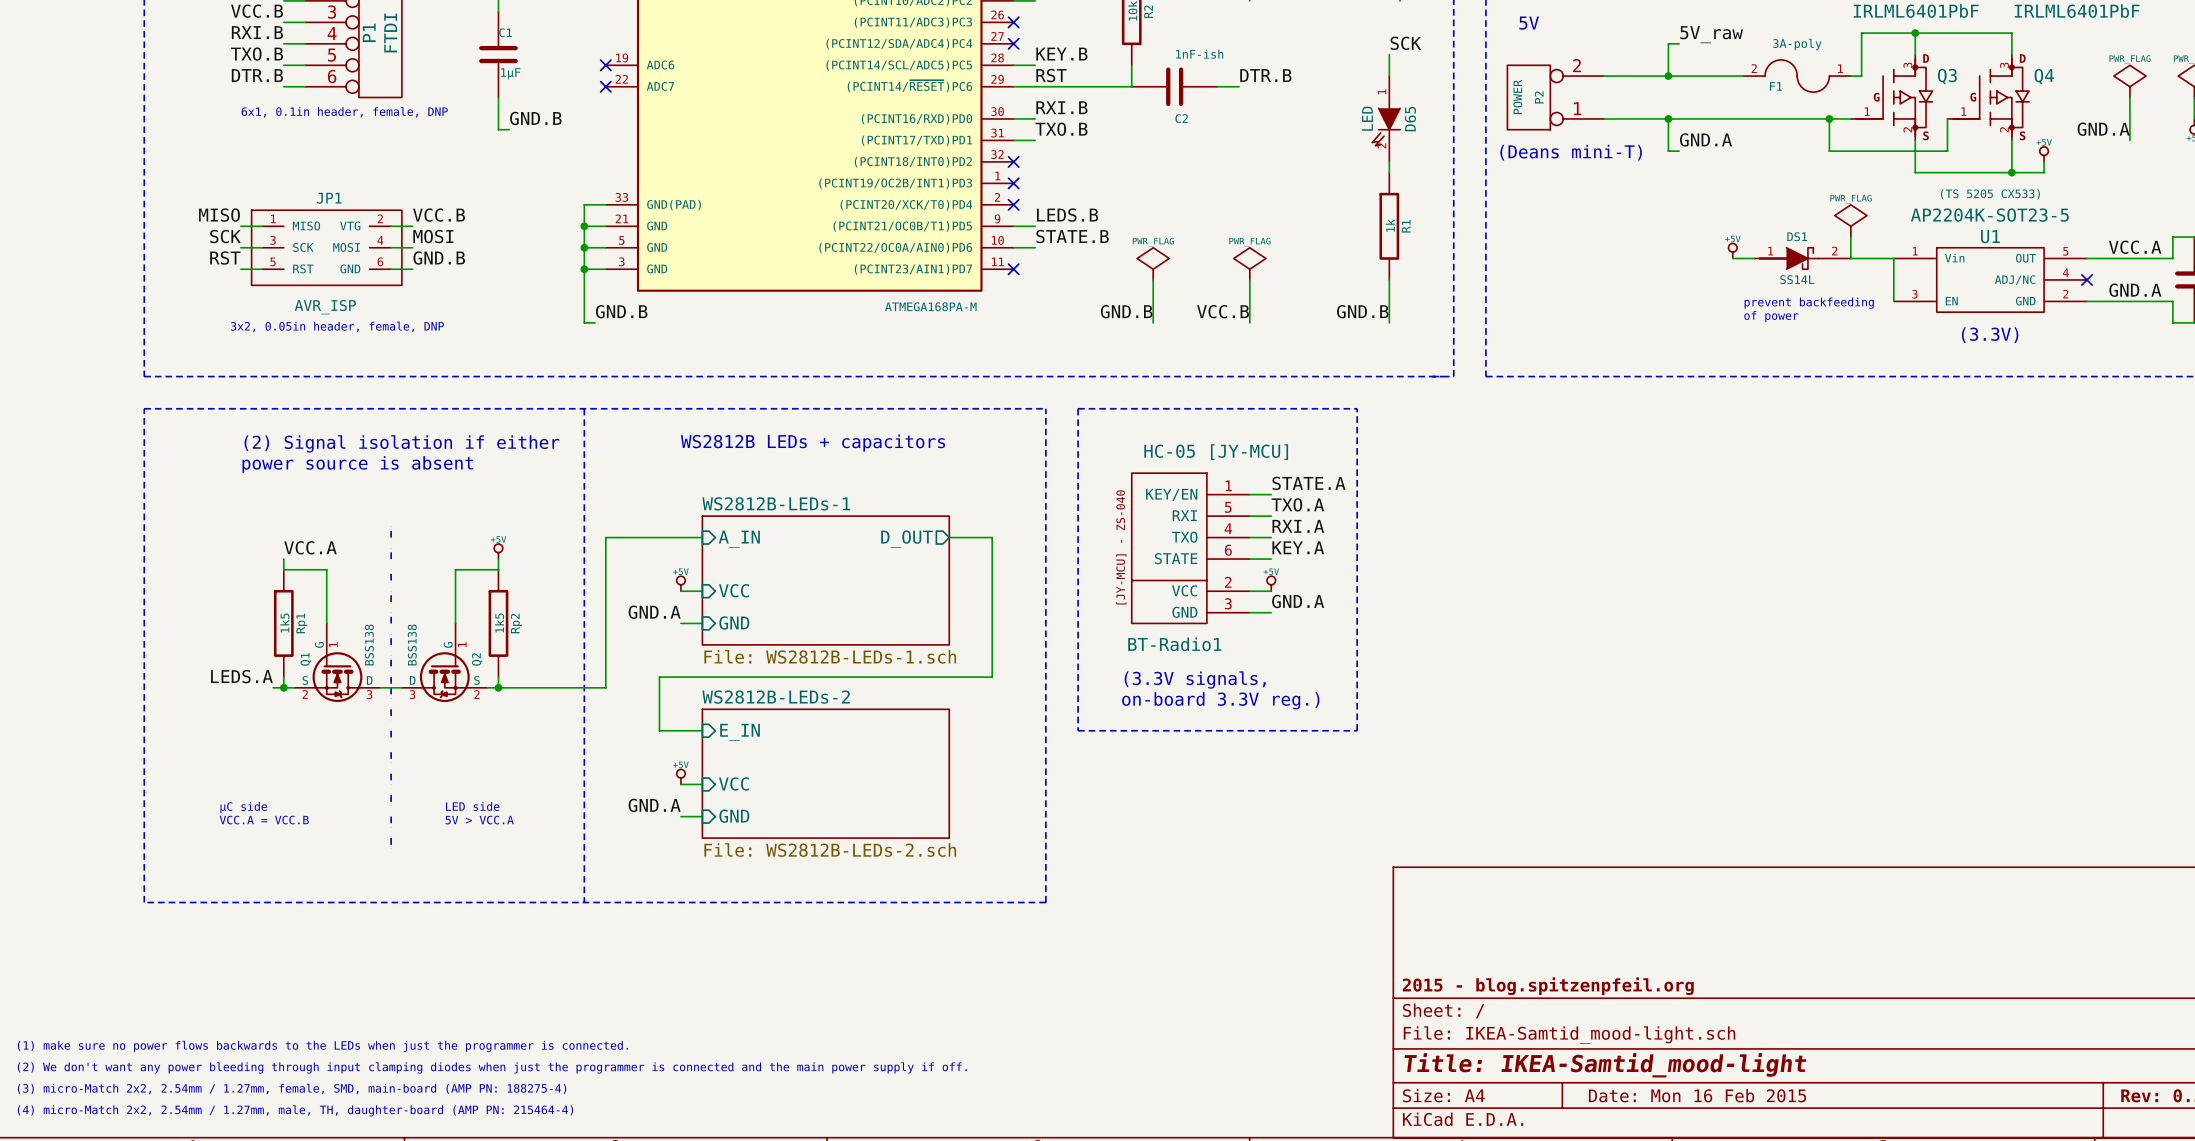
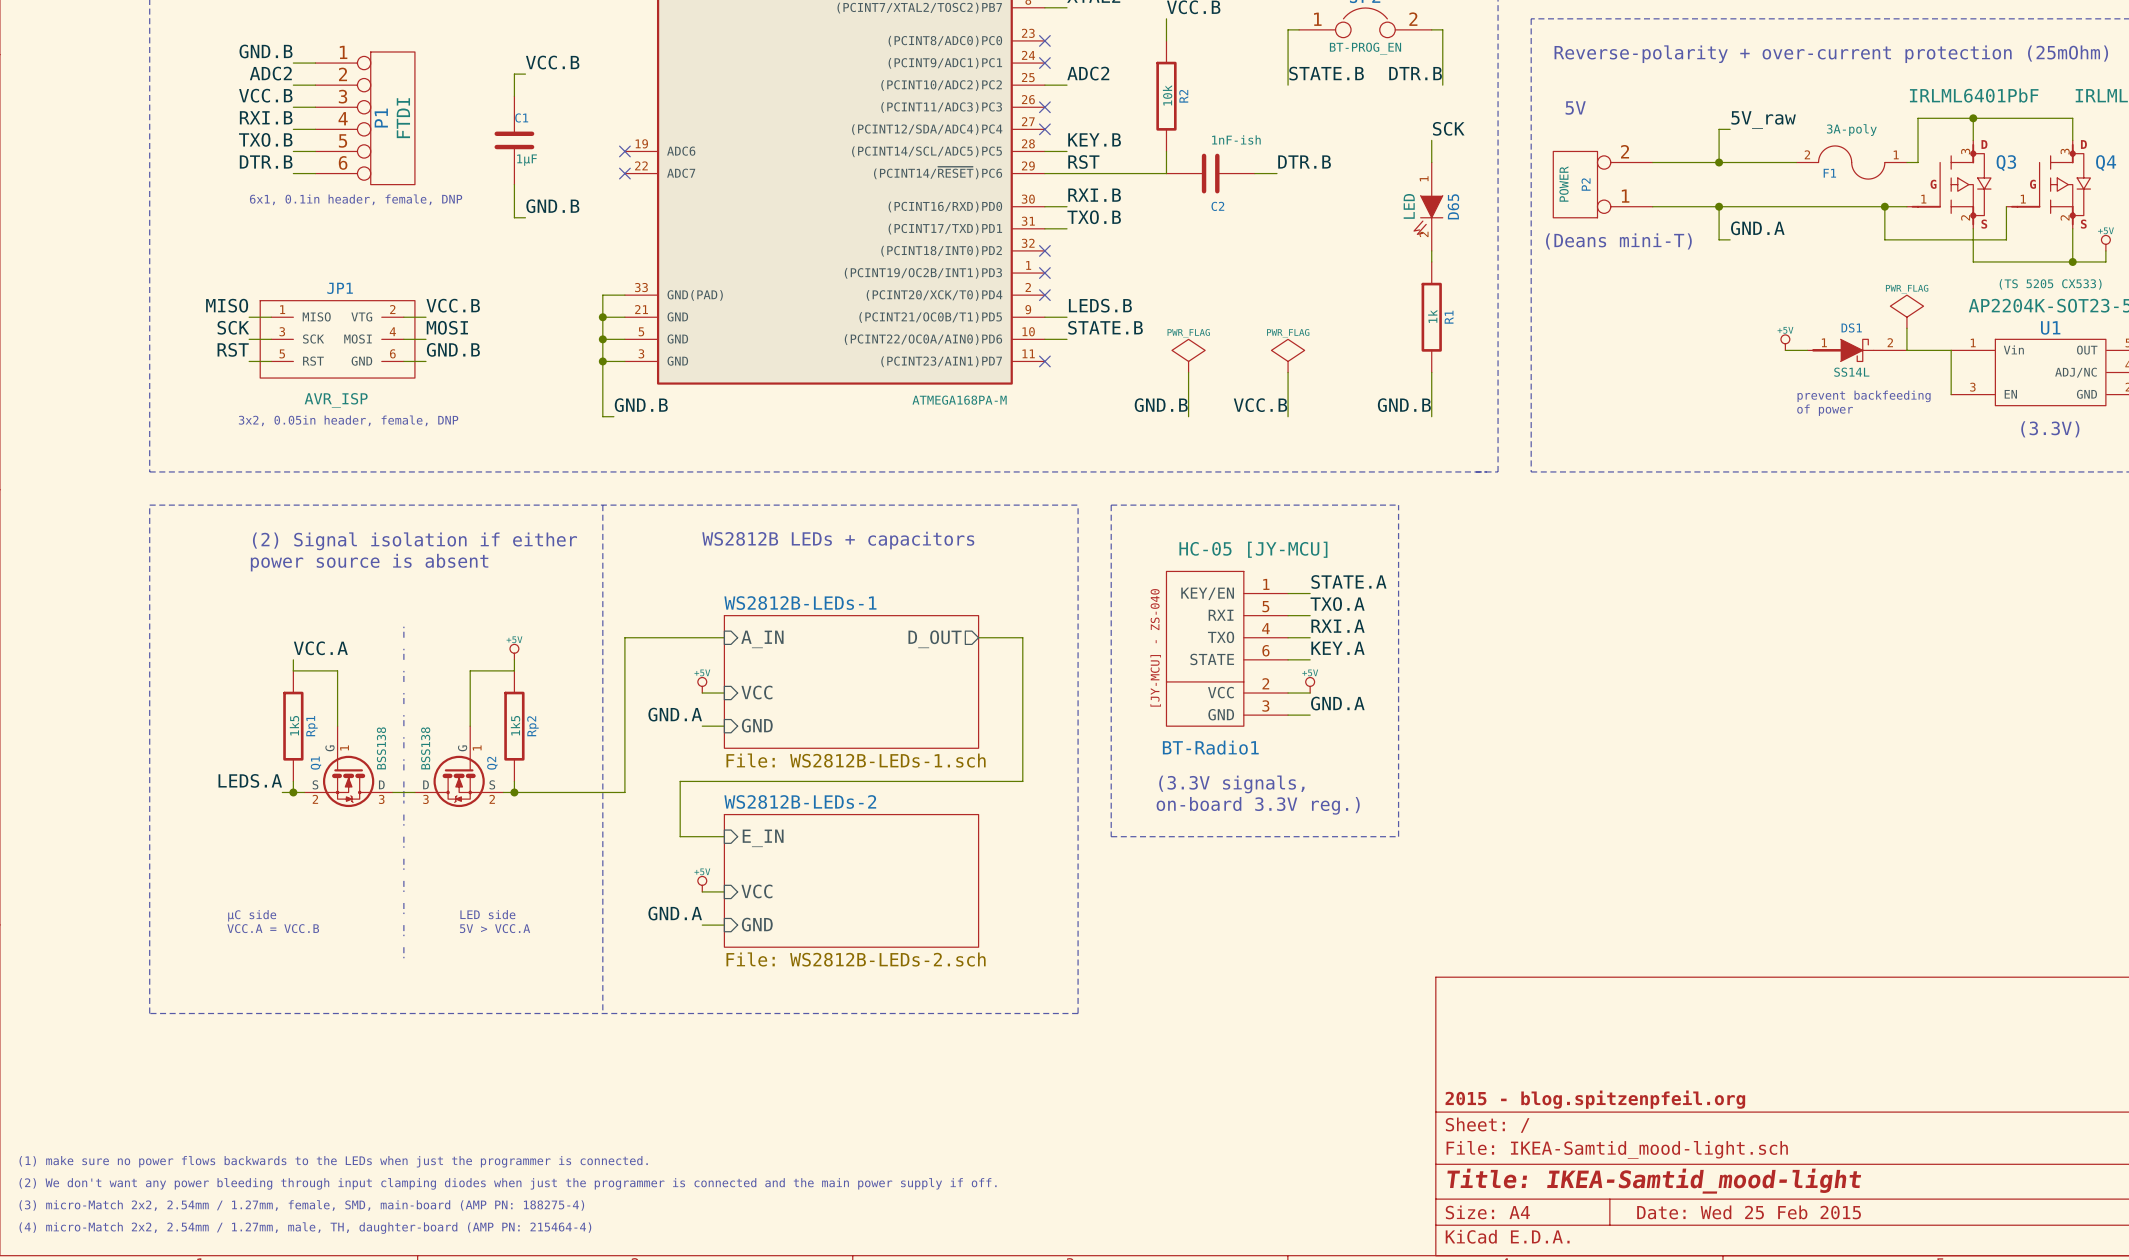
title block: Date: Mon 16 Feb 2015 (1697, 1095) -> Date: Wed 25 Feb 2015 (1749, 1212)

